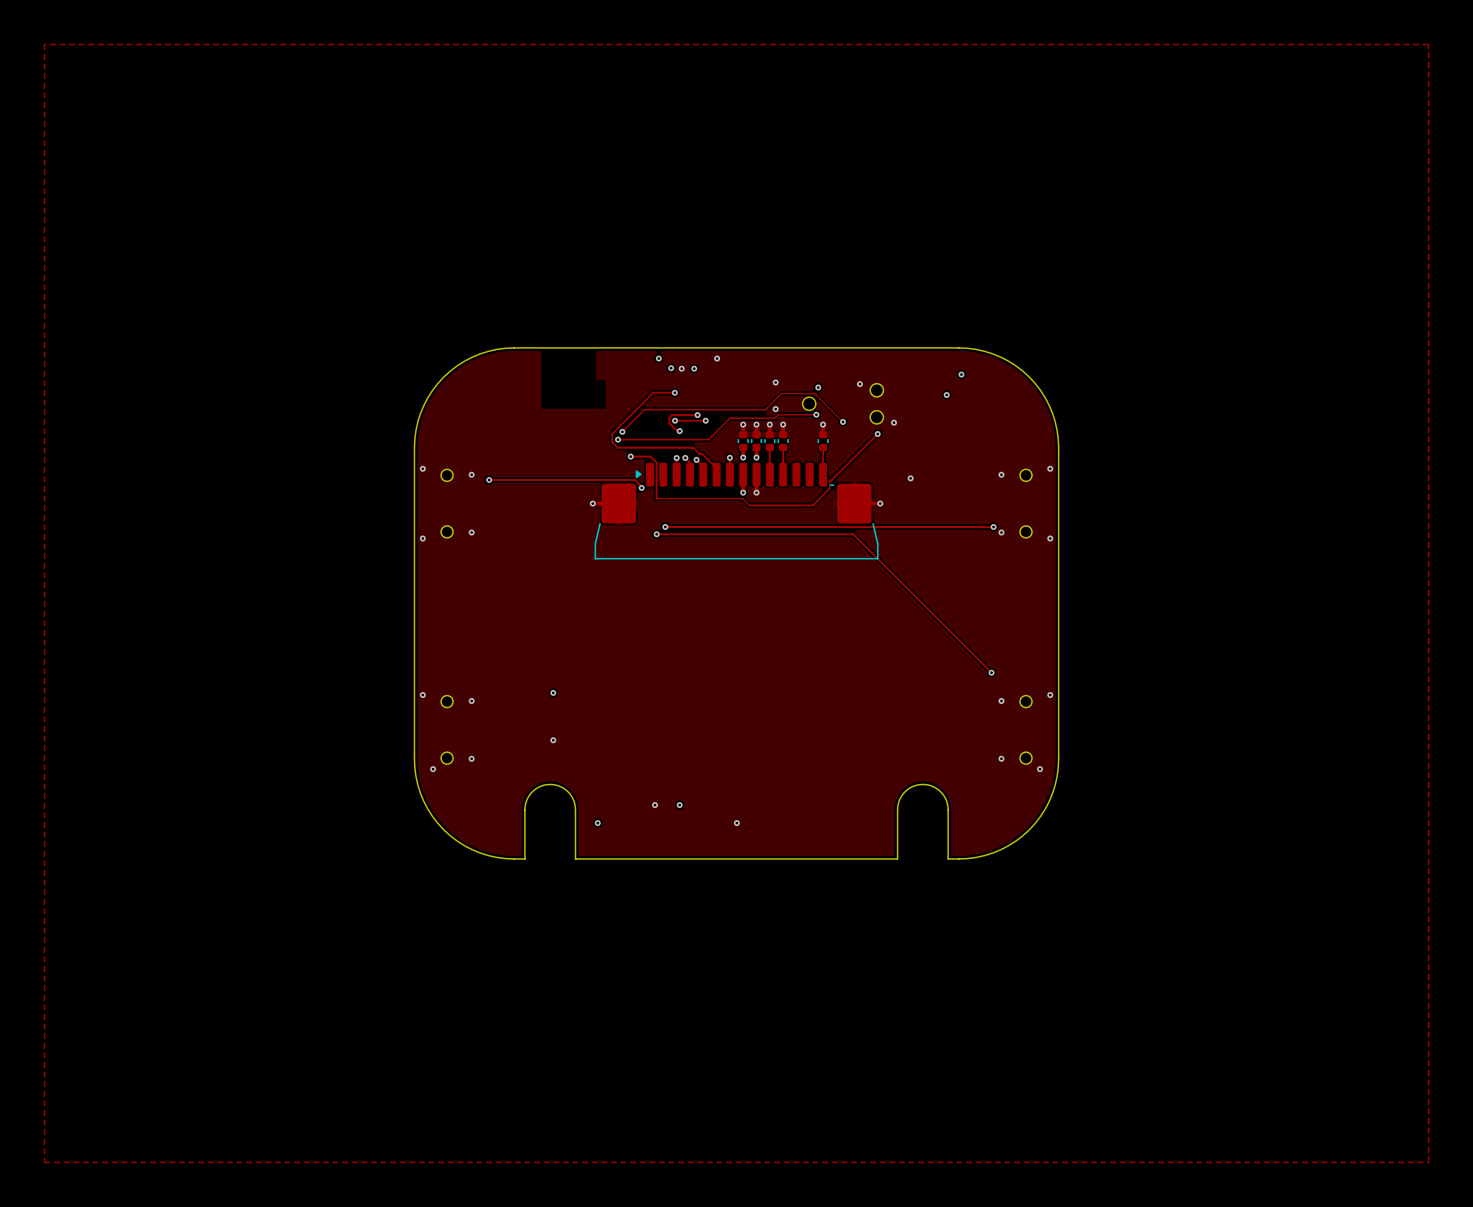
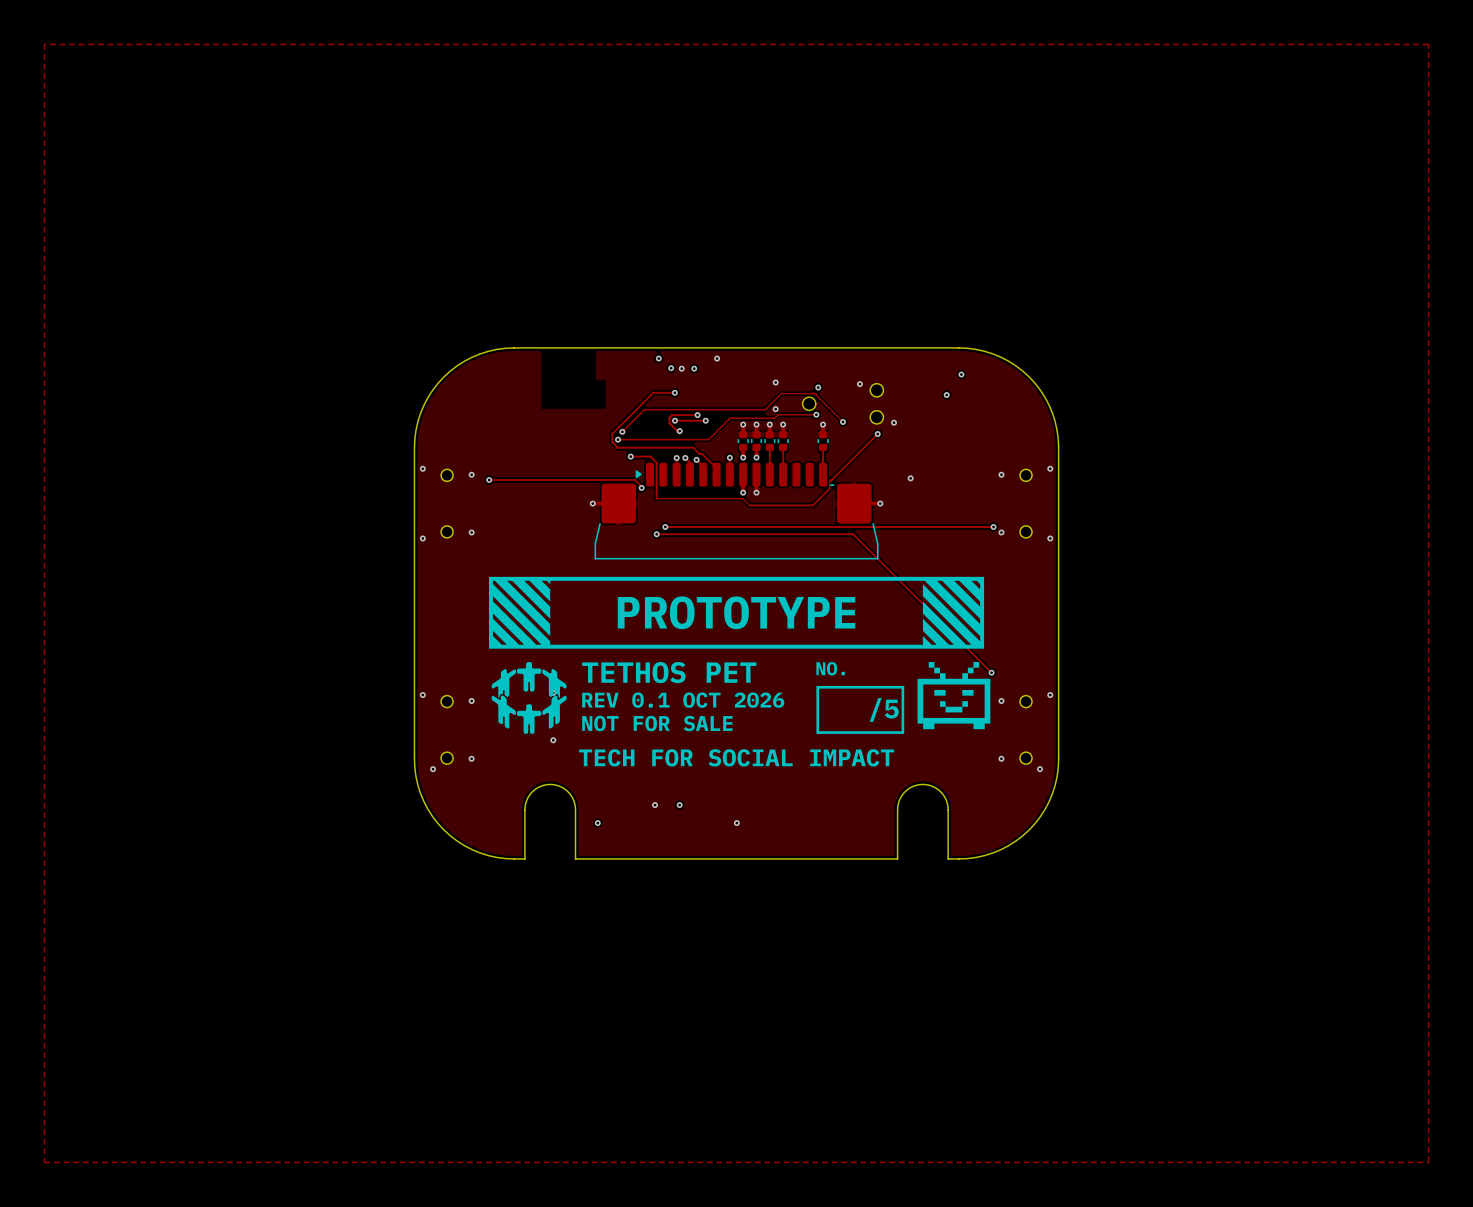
drawing: none -> [488, 576, 991, 767]
drawing: none -> [579, 749, 635, 767]
drawing: none -> [652, 749, 793, 767]

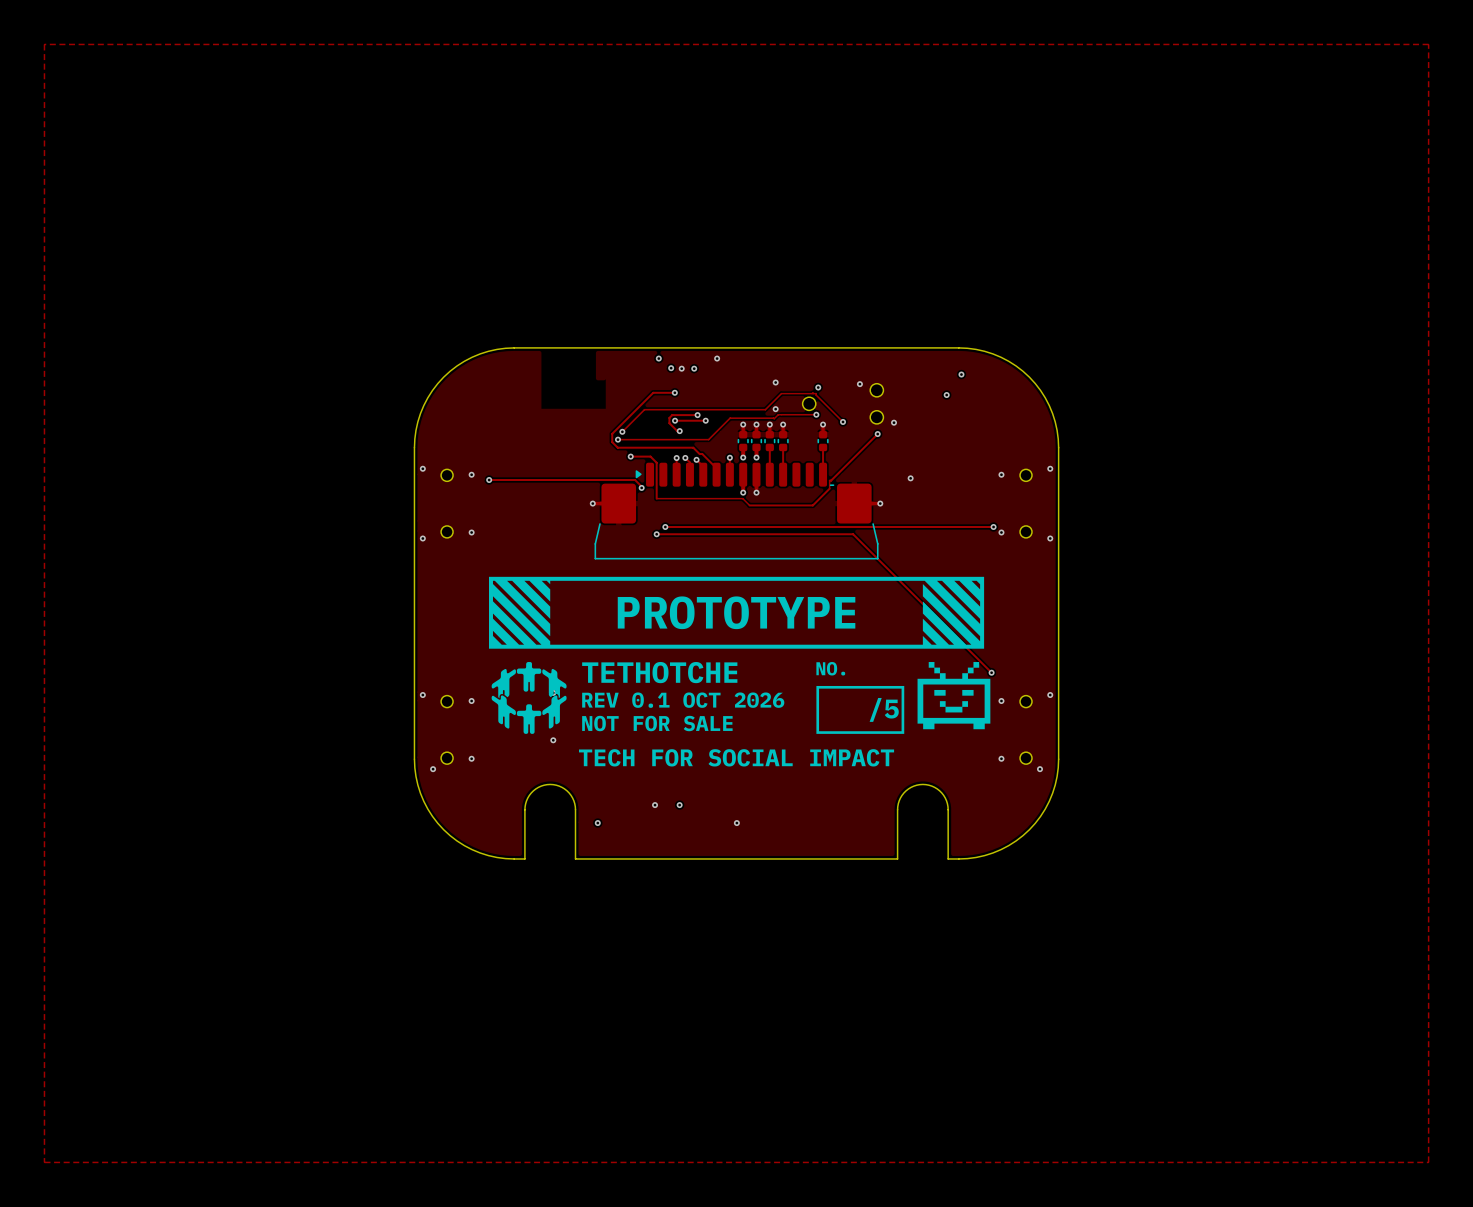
drawing: [670, 662, 686, 684] -> none
drawing: none -> [688, 662, 704, 684]
drawing shape: [706, 662, 721, 683] -> [706, 662, 721, 683]
drawing position: (748, 672) -> (678, 672)

